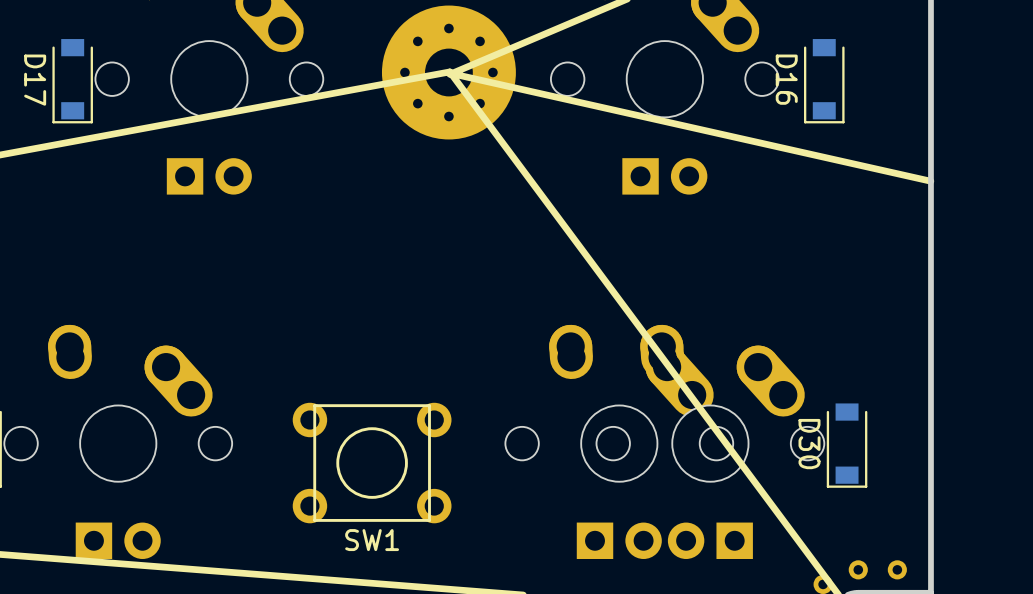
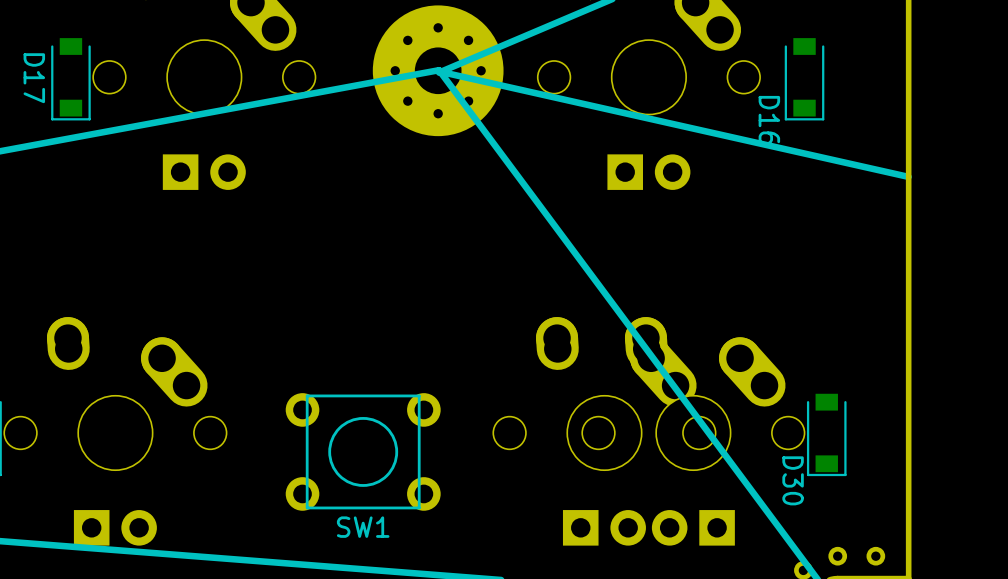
D16 name position: D16 (786, 79) -> D16 (769, 120)
D30 name position: D30 (809, 444) -> D30 (793, 480)

